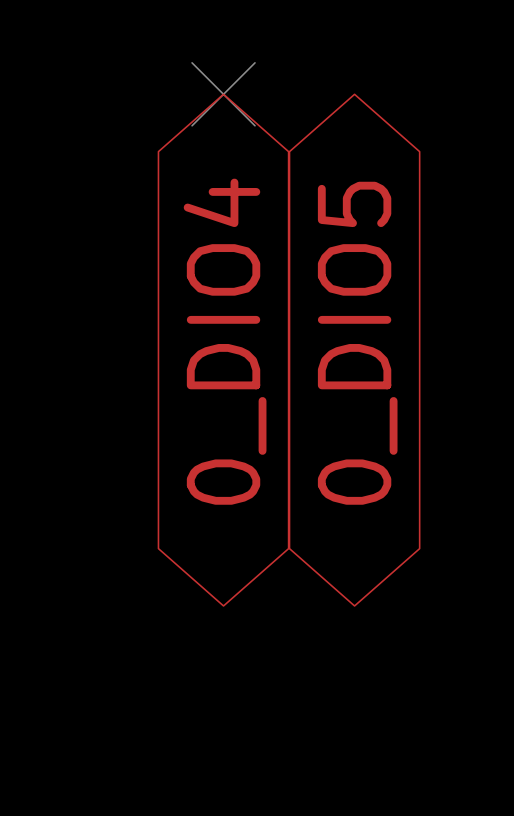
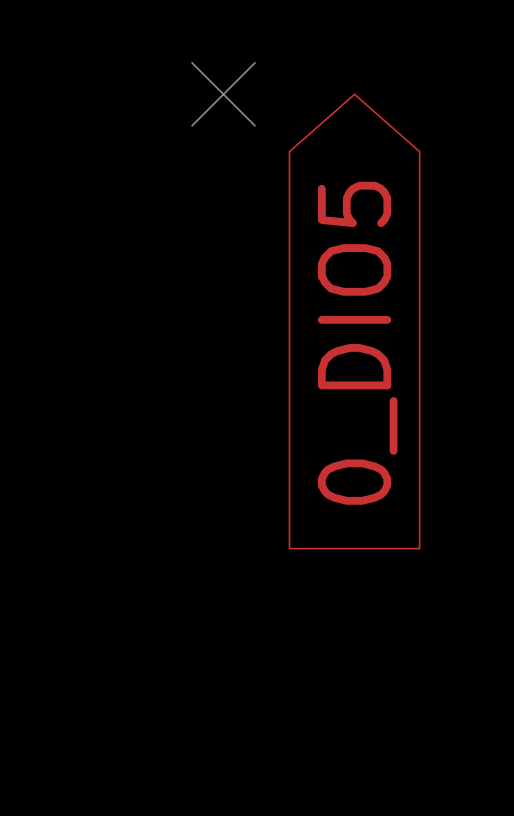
global label: 0_DIO4 (225, 341) -> none
global label shape: bidirectional (357, 343) -> input (357, 343)

